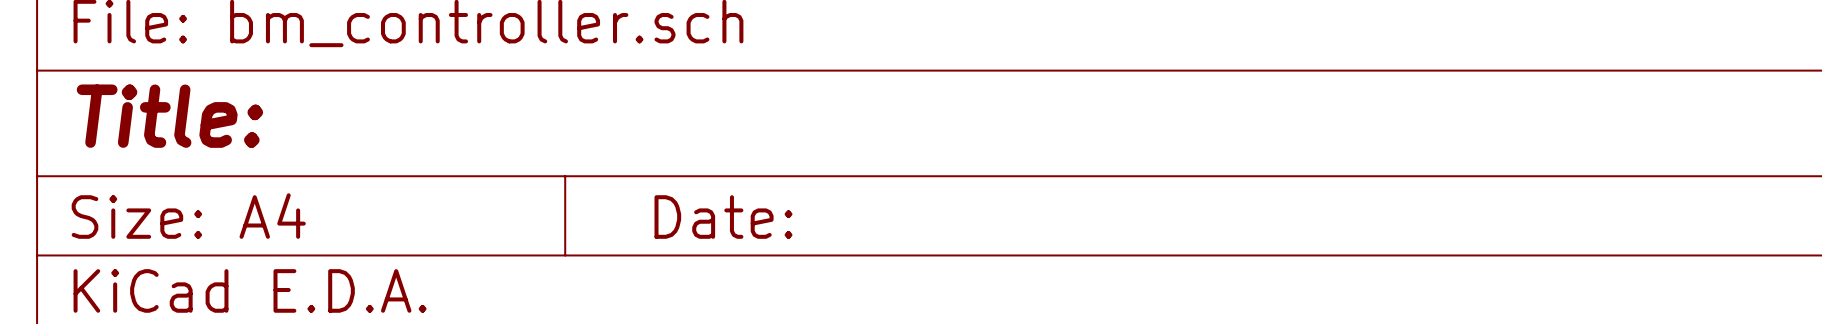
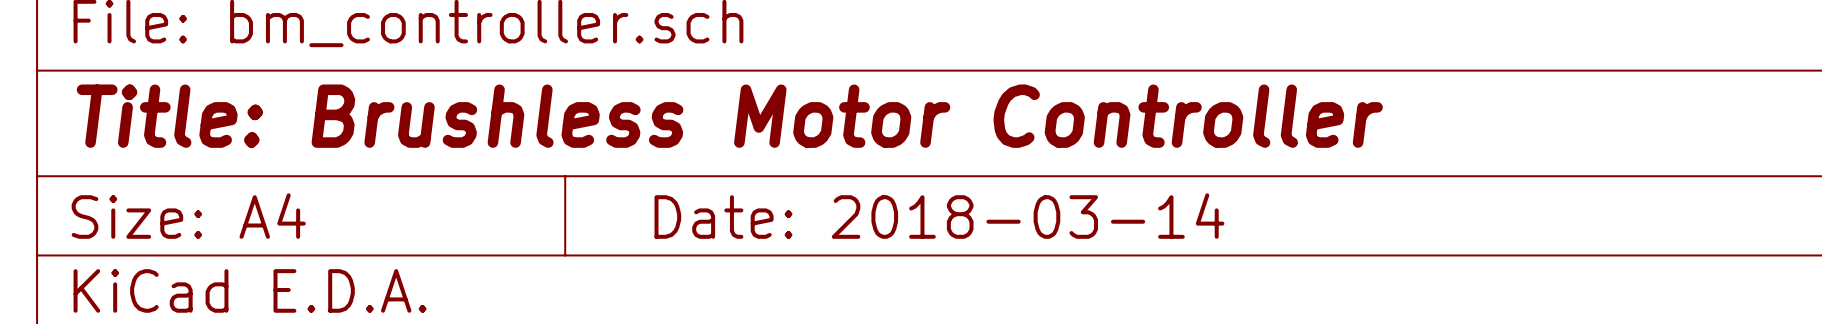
title block: Title: (169, 116) -> Title: Brushless Motor Controller (729, 116)
title block: Date: (723, 217) -> Date: 2018-03-14 (939, 216)

